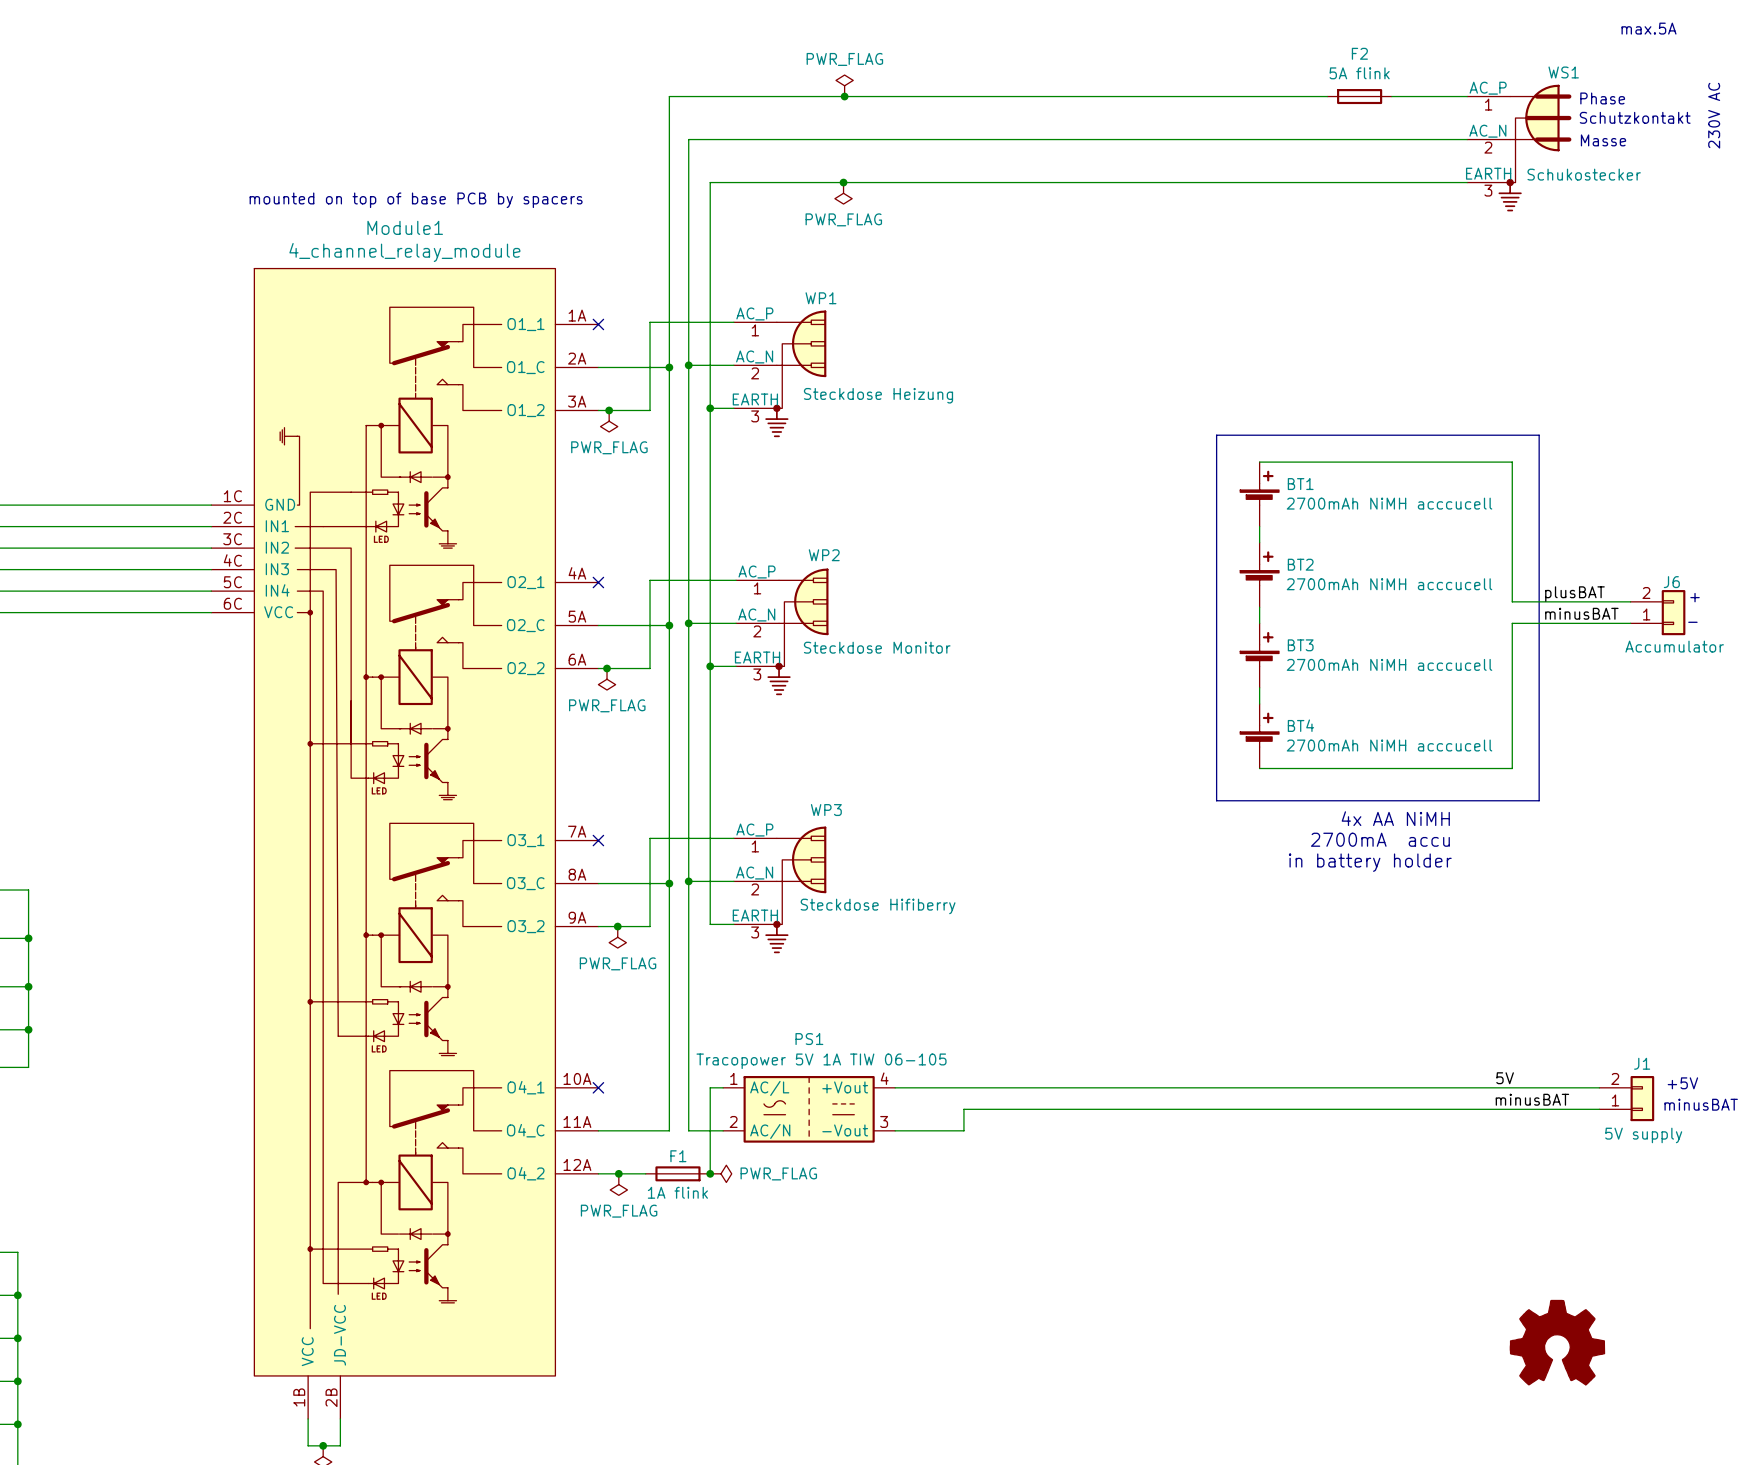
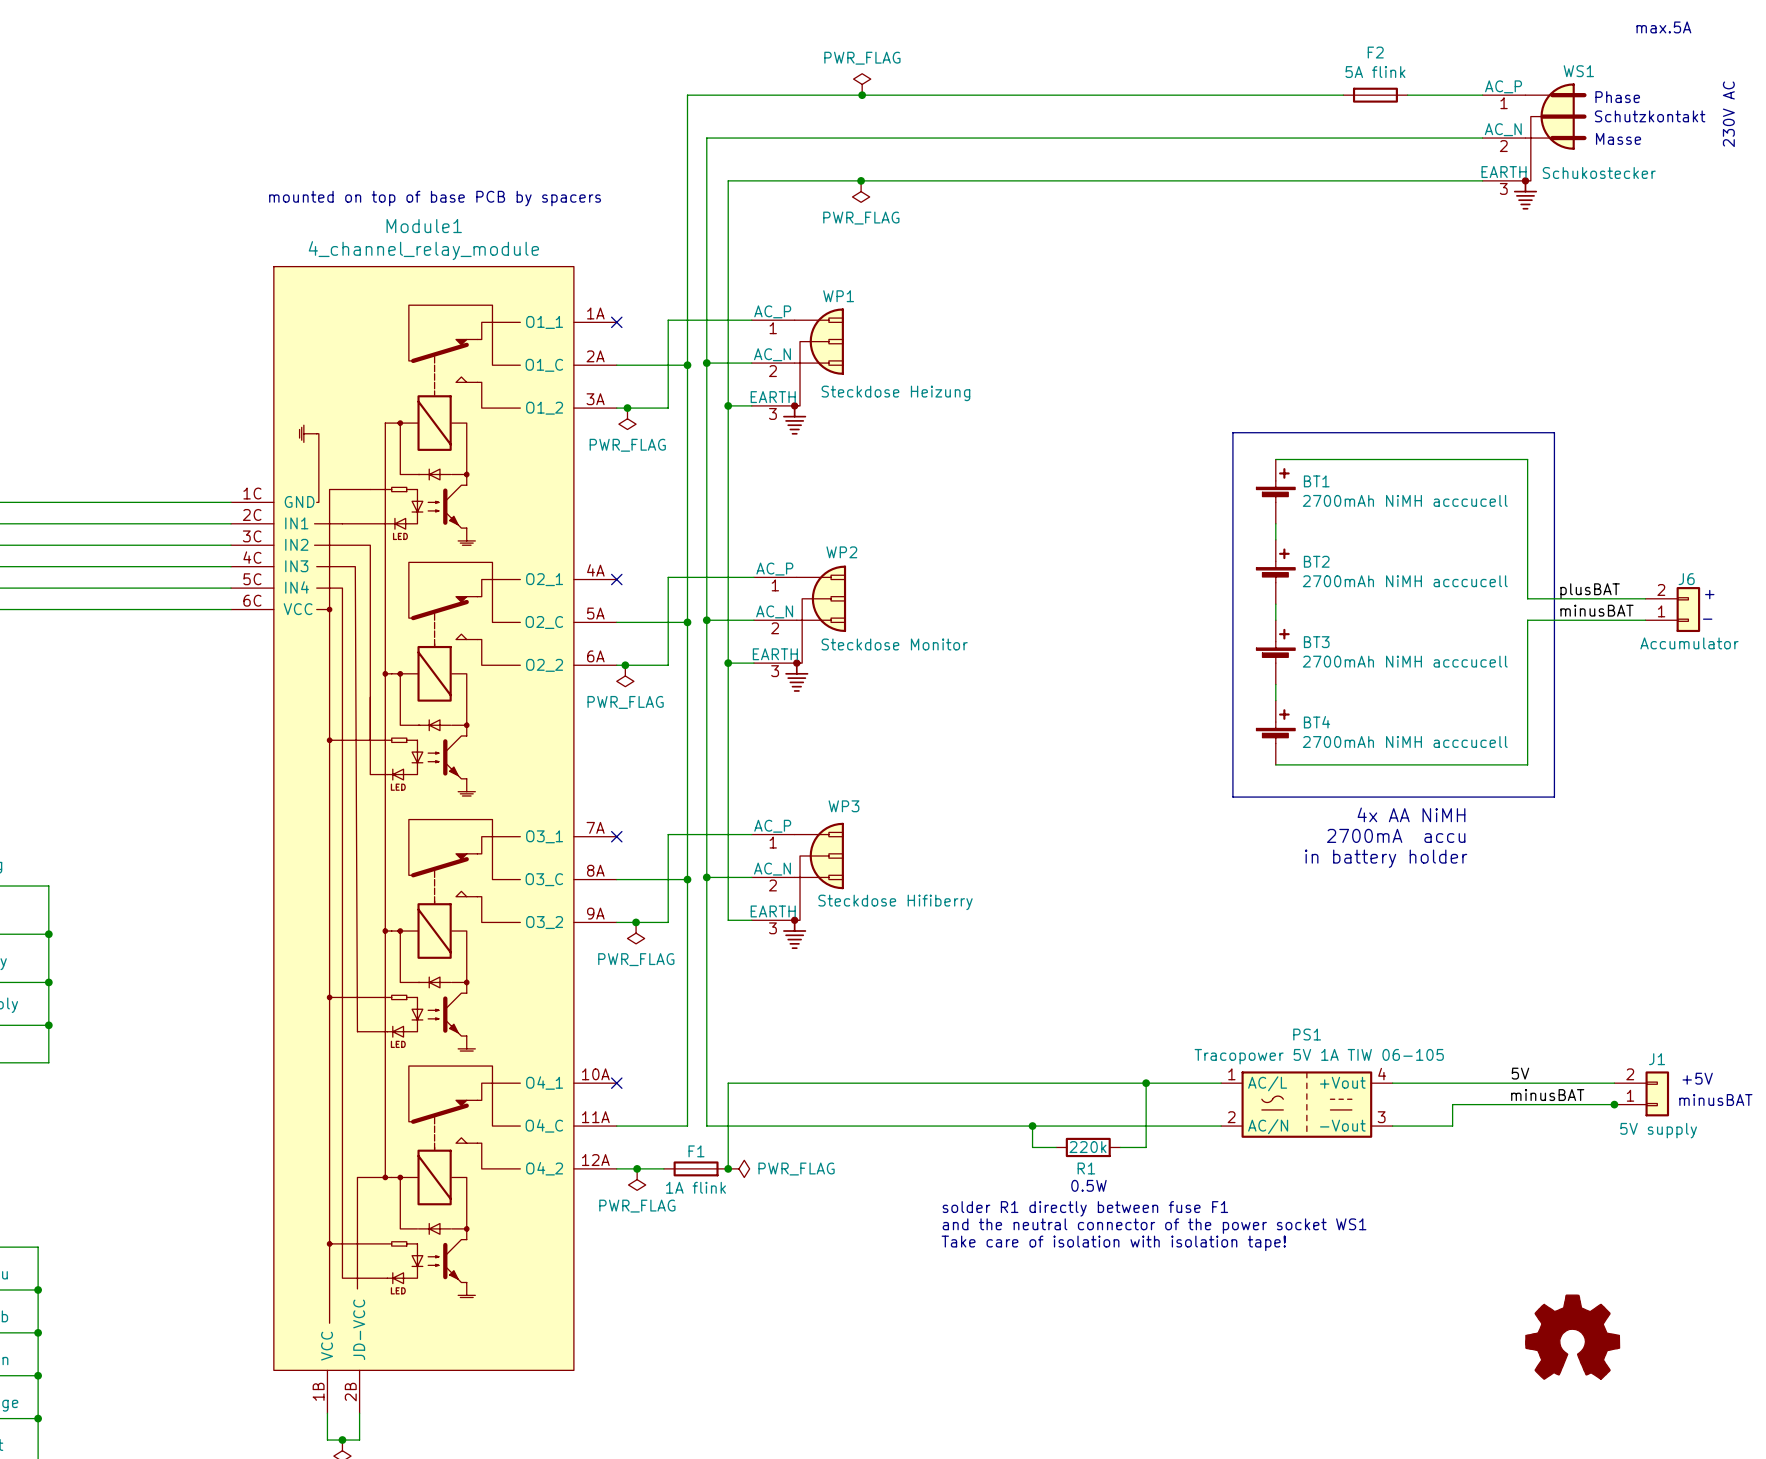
wire: none -> (1146, 1083) (1146, 1147) (1120, 1147)
junction: none -> (1146, 1083)
PS1 position: (809, 1109) -> (1306, 1104)
wire: (1437, 1109) (963, 1109) (963, 1130) -> (1221, 1126) (981, 1126)
wire: none -> (1452, 1104) (1452, 1126) (1392, 1126)
junction: none -> (1614, 1104)
wire: none -> (1032, 1126) (1032, 1147) (1056, 1147)
junction: none -> (1032, 1126)
R1: none -> 220k (1088, 1147)
text: none -> 0.5W (1088, 1185)
text: none -> solder R1 directly between fuse F1 (1085, 1208)
text: none -> and the neutral connector of the power socket WS1 (1154, 1226)
text: none -> Take care of isolation with isolation tape! (1113, 1243)

